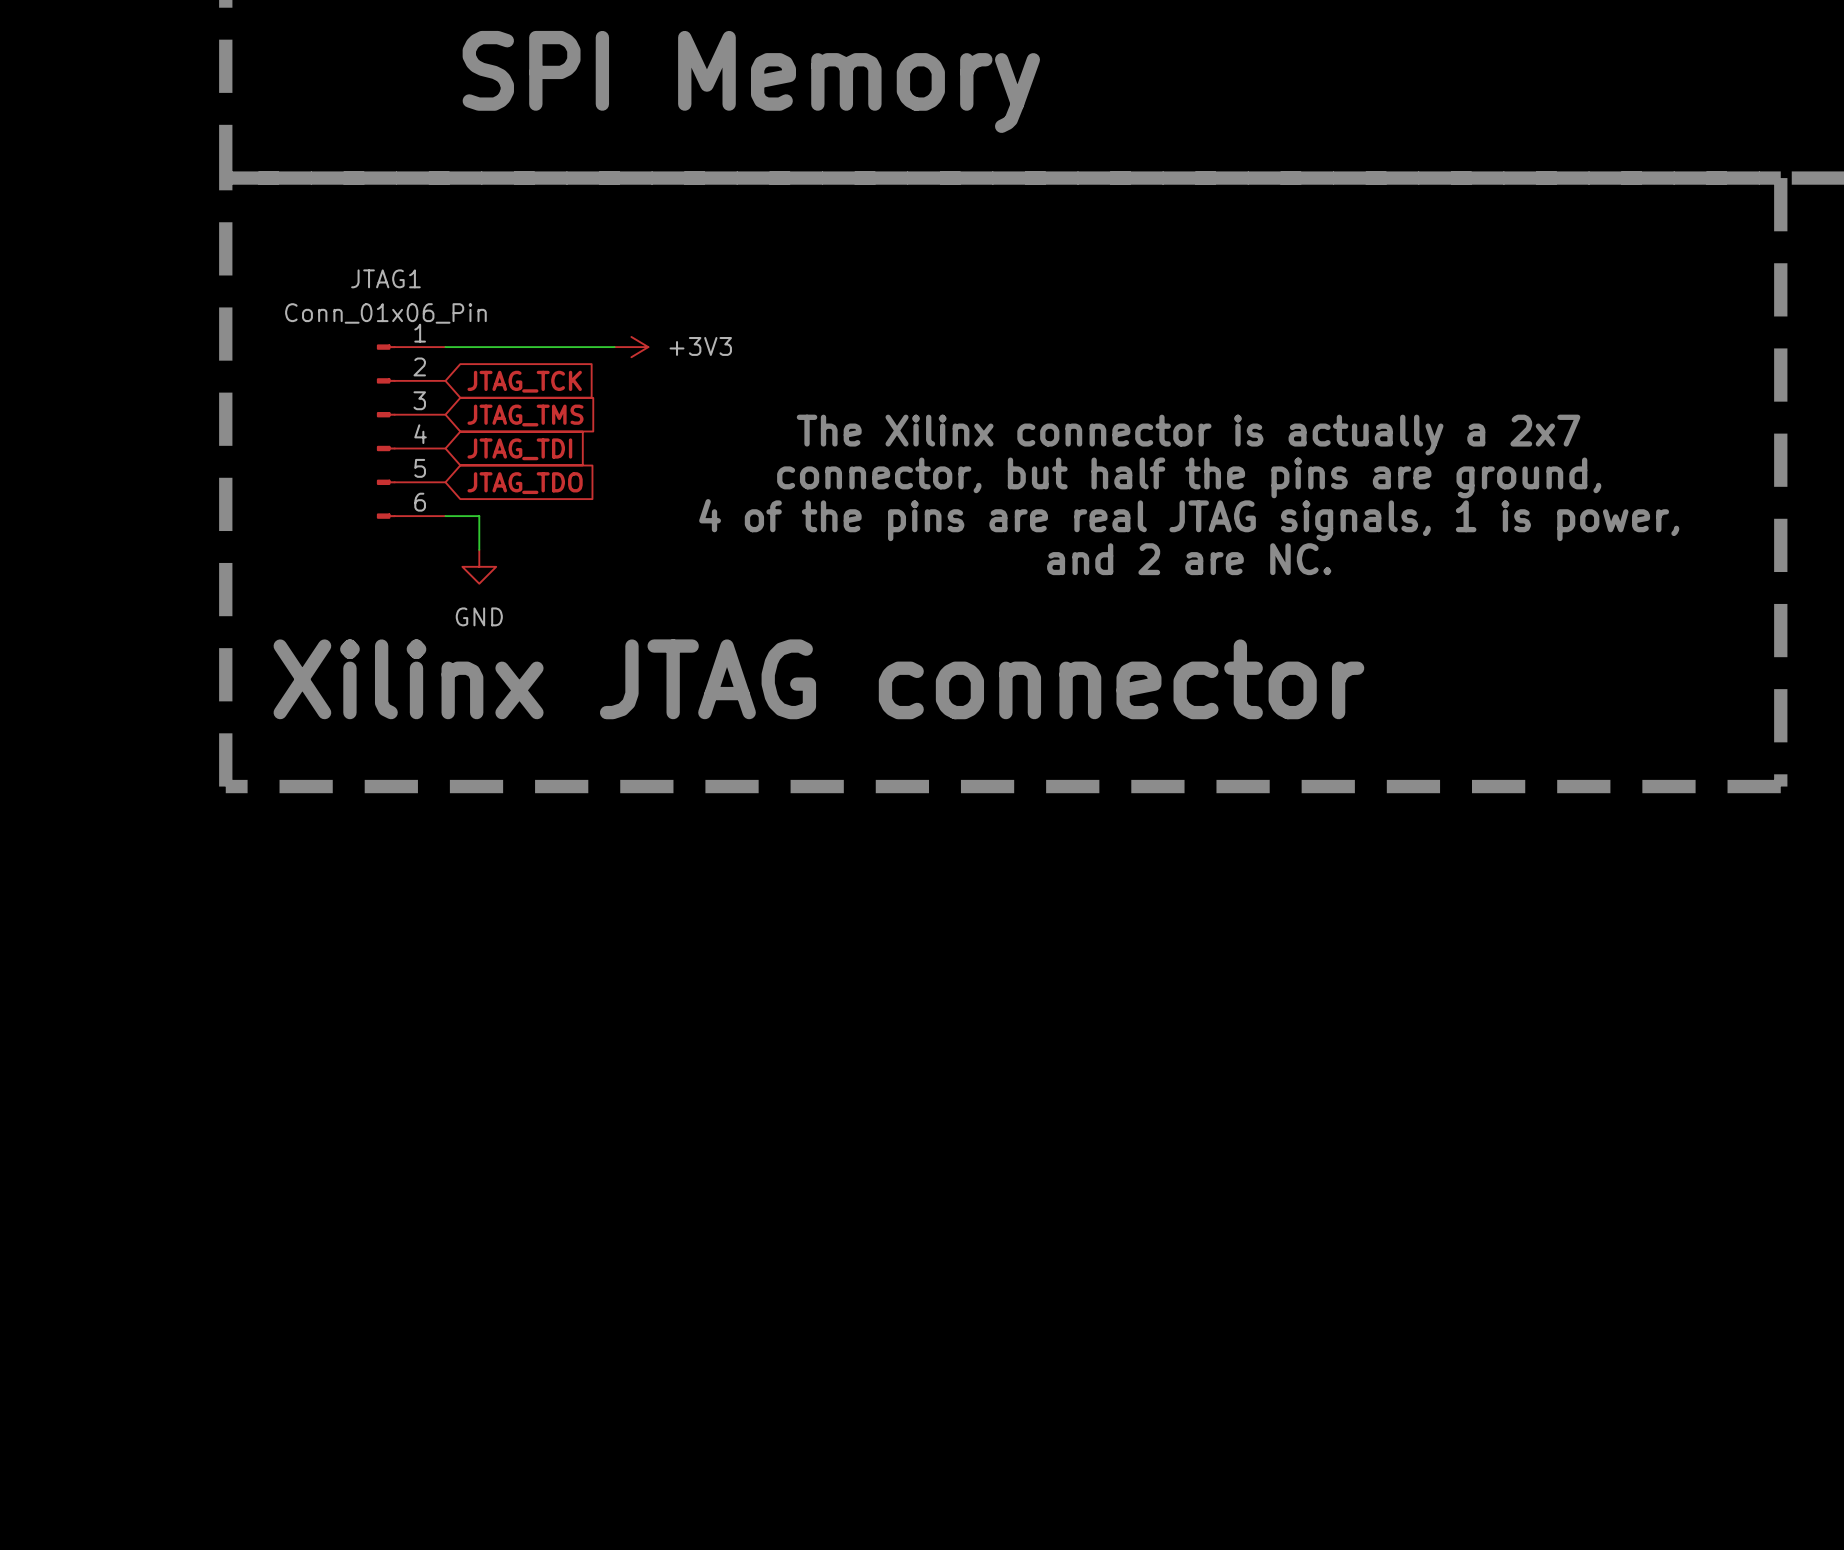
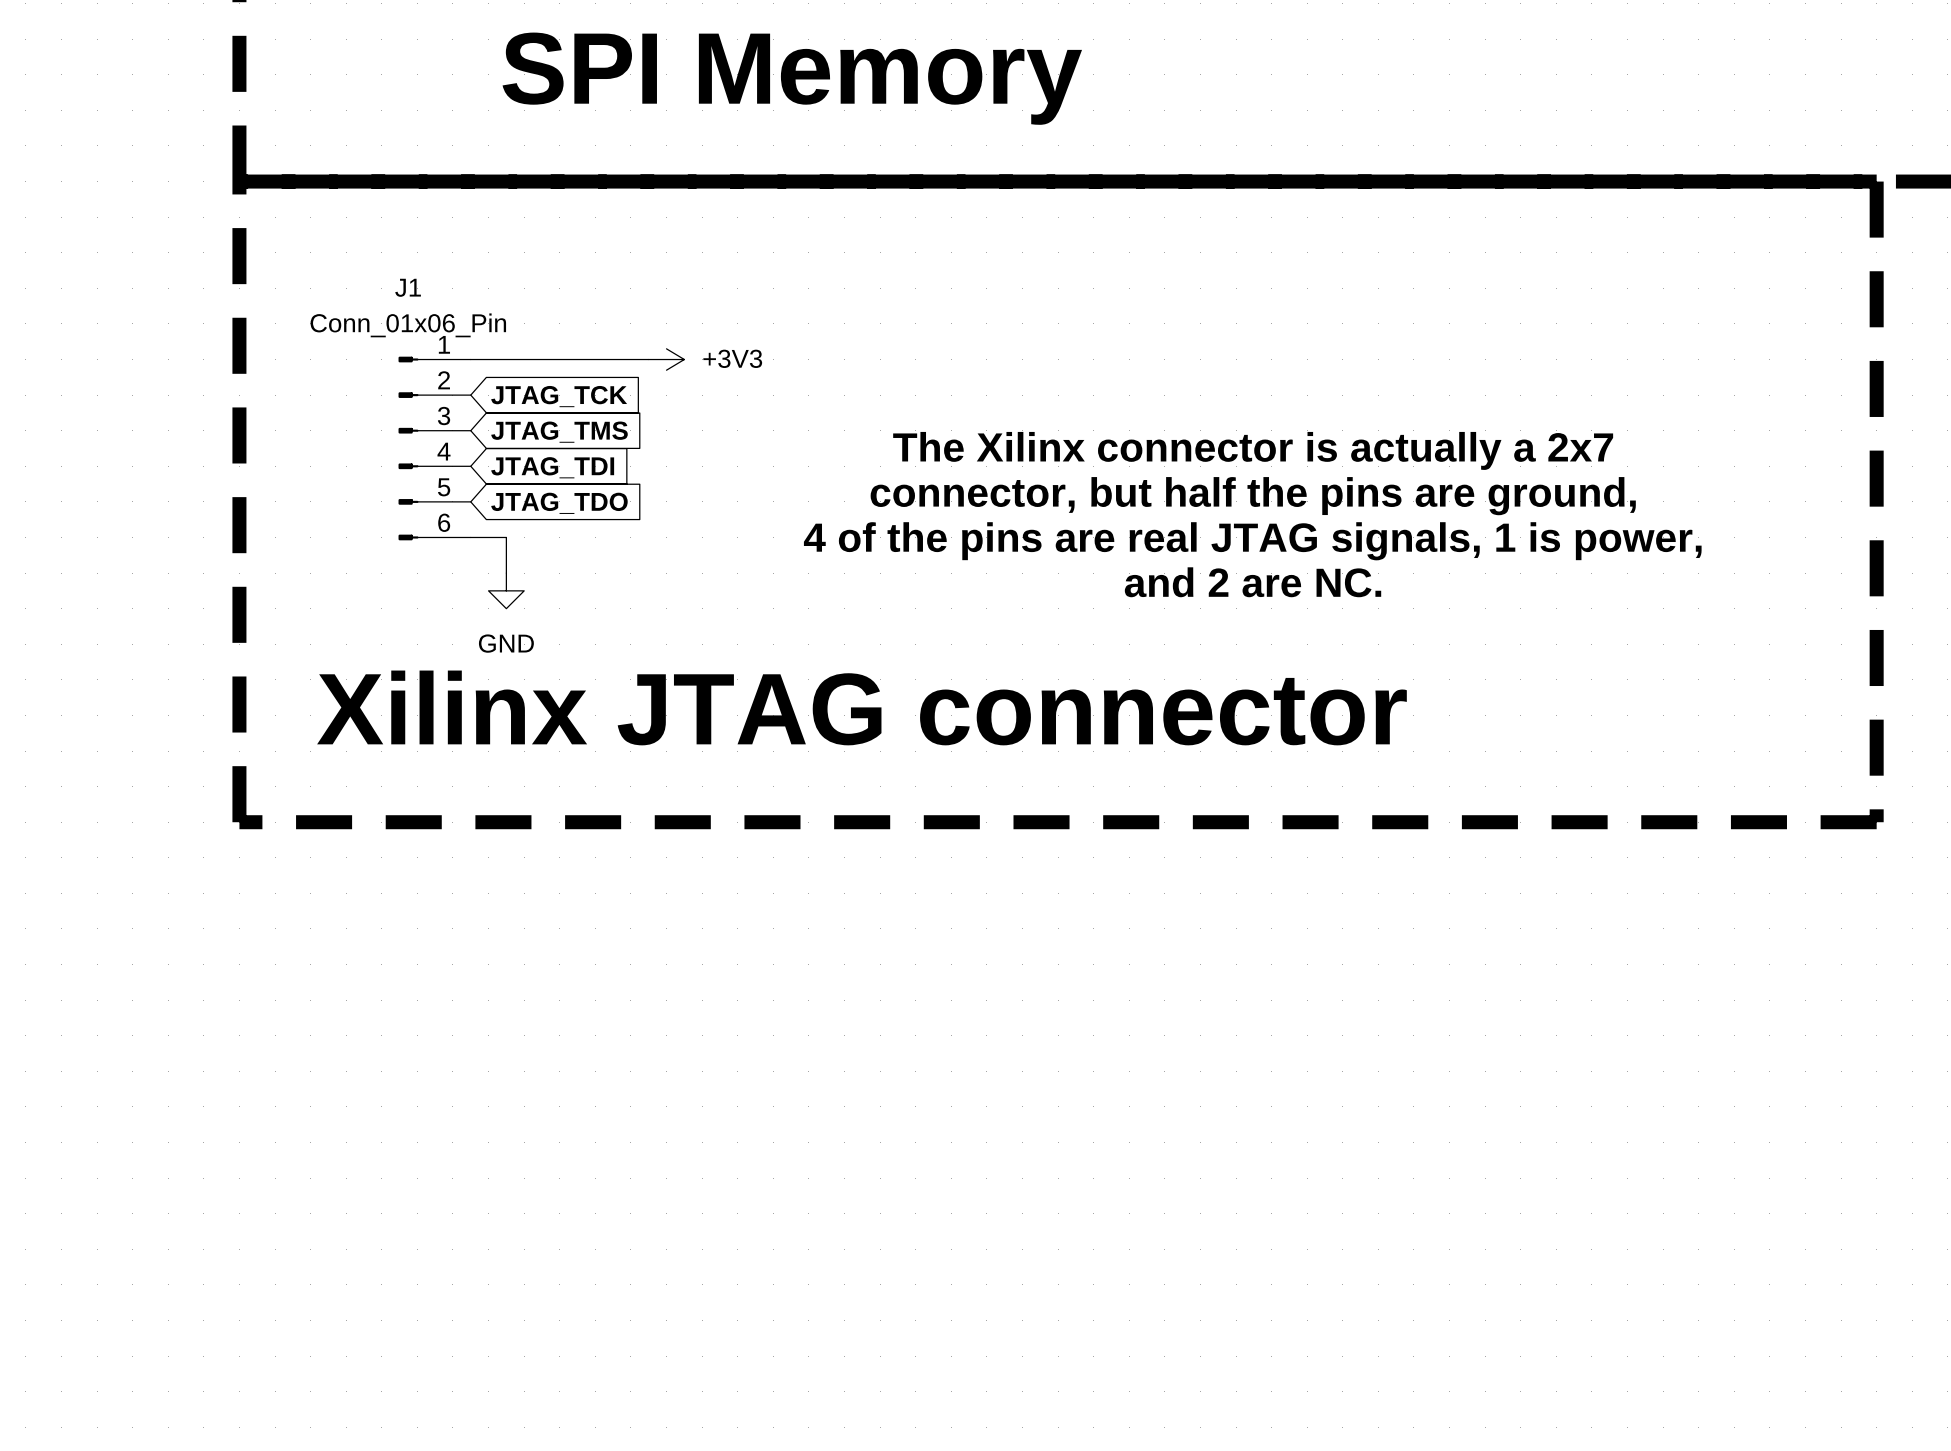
JTAG1 name: JTAG1 (385, 278) -> J1 (408, 287)

